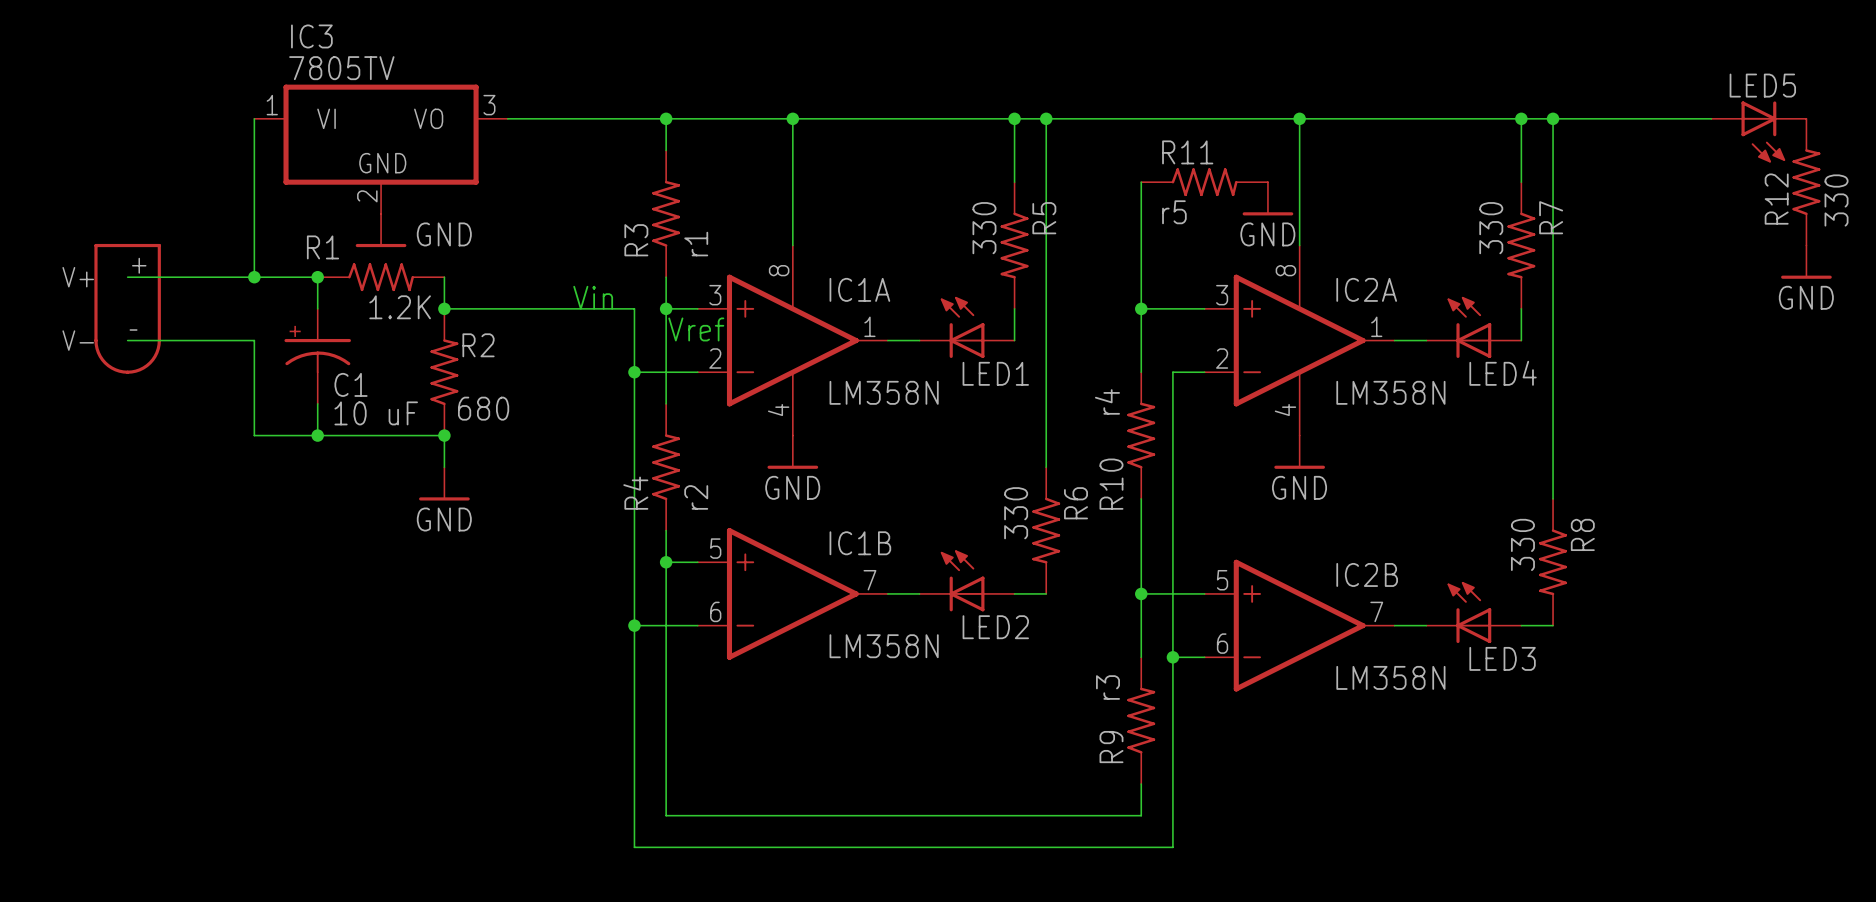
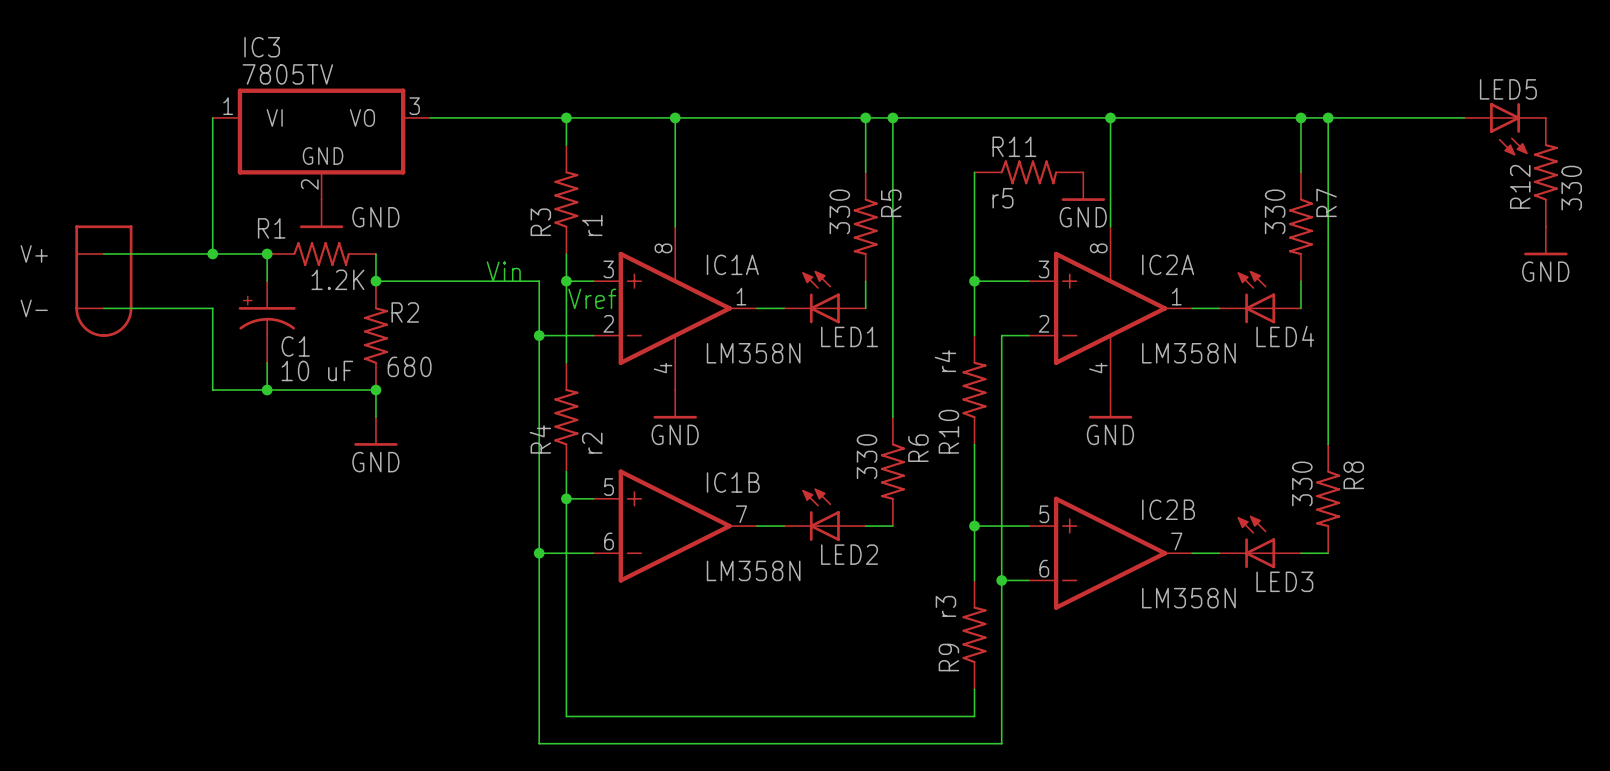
part symbol: [94, 243, 161, 374] -> [75, 225, 133, 337]

